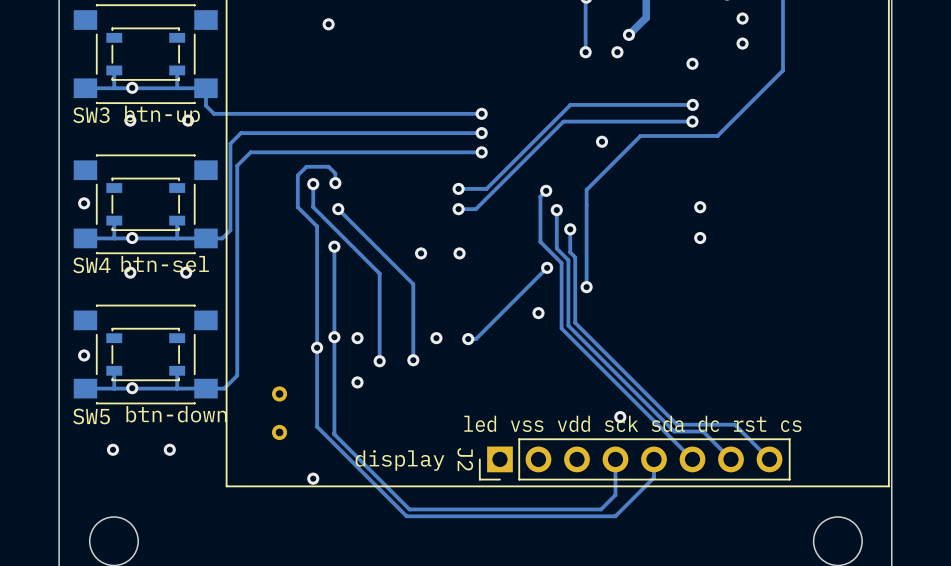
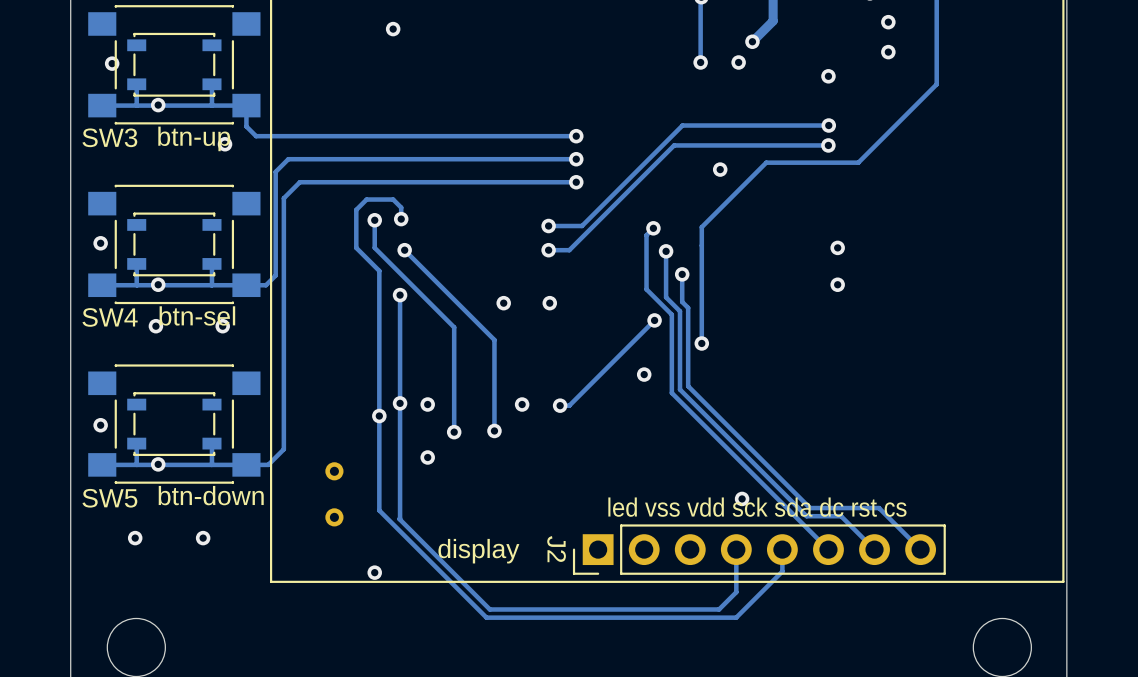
via position: (130, 120) -> (112, 63)

